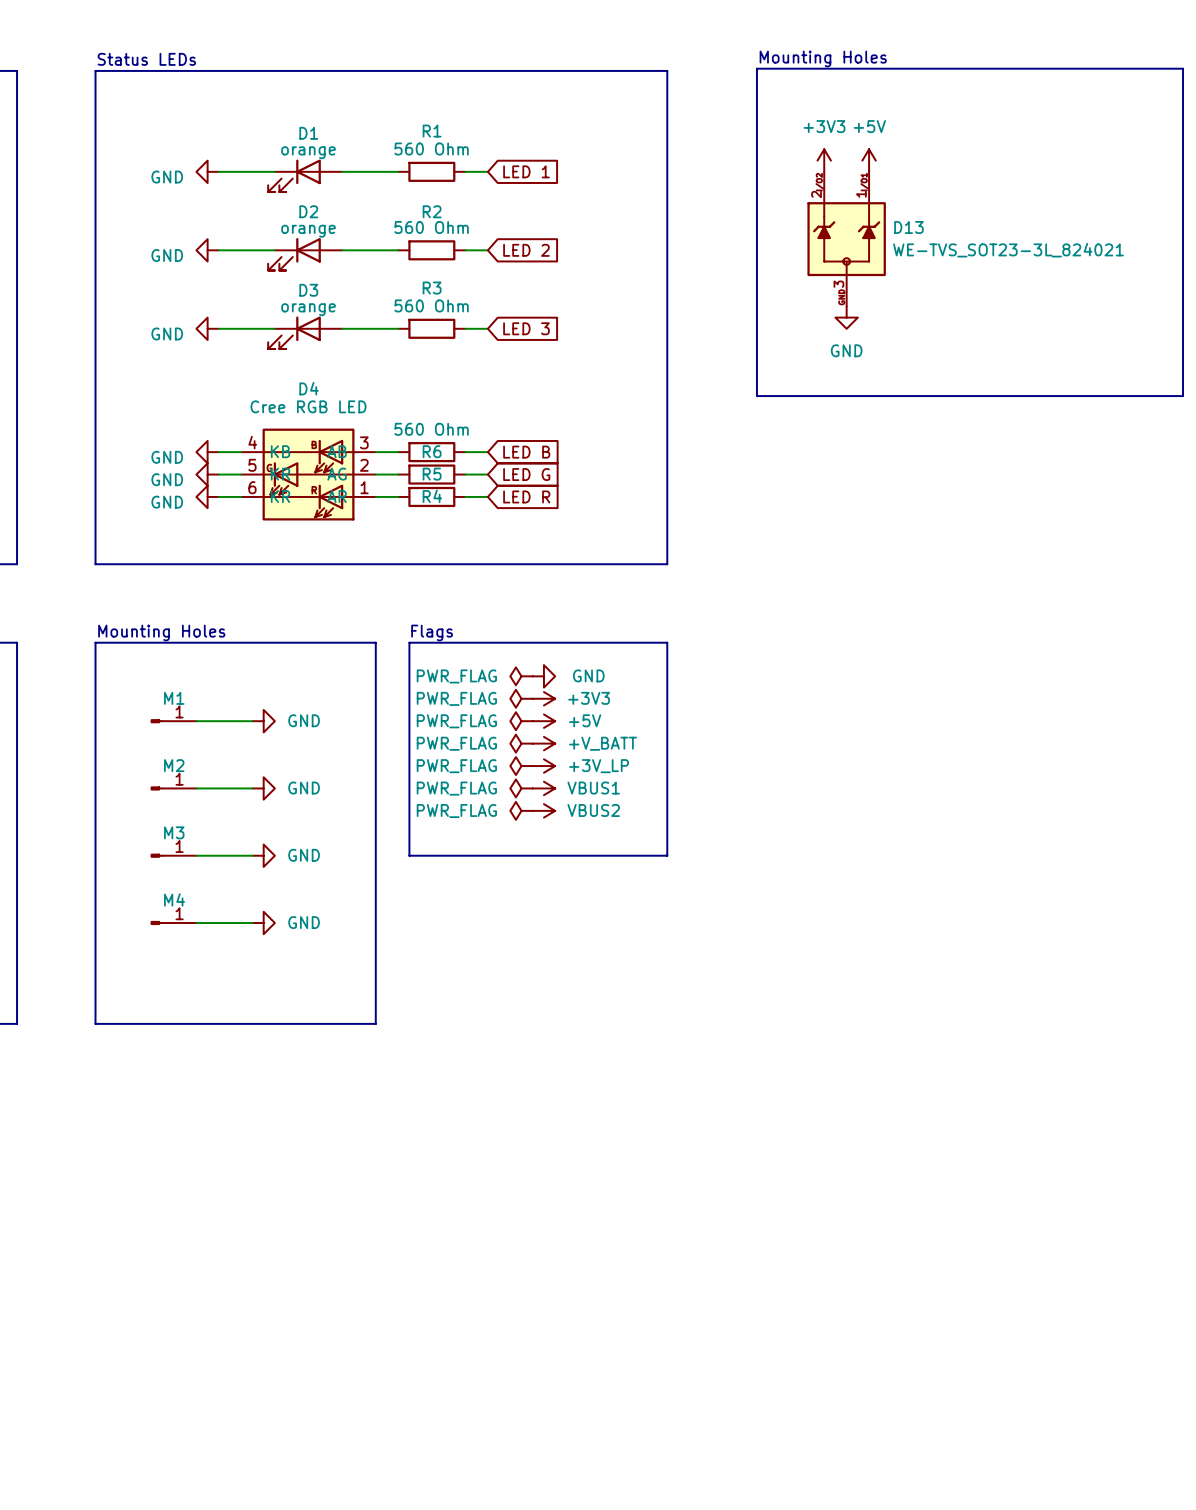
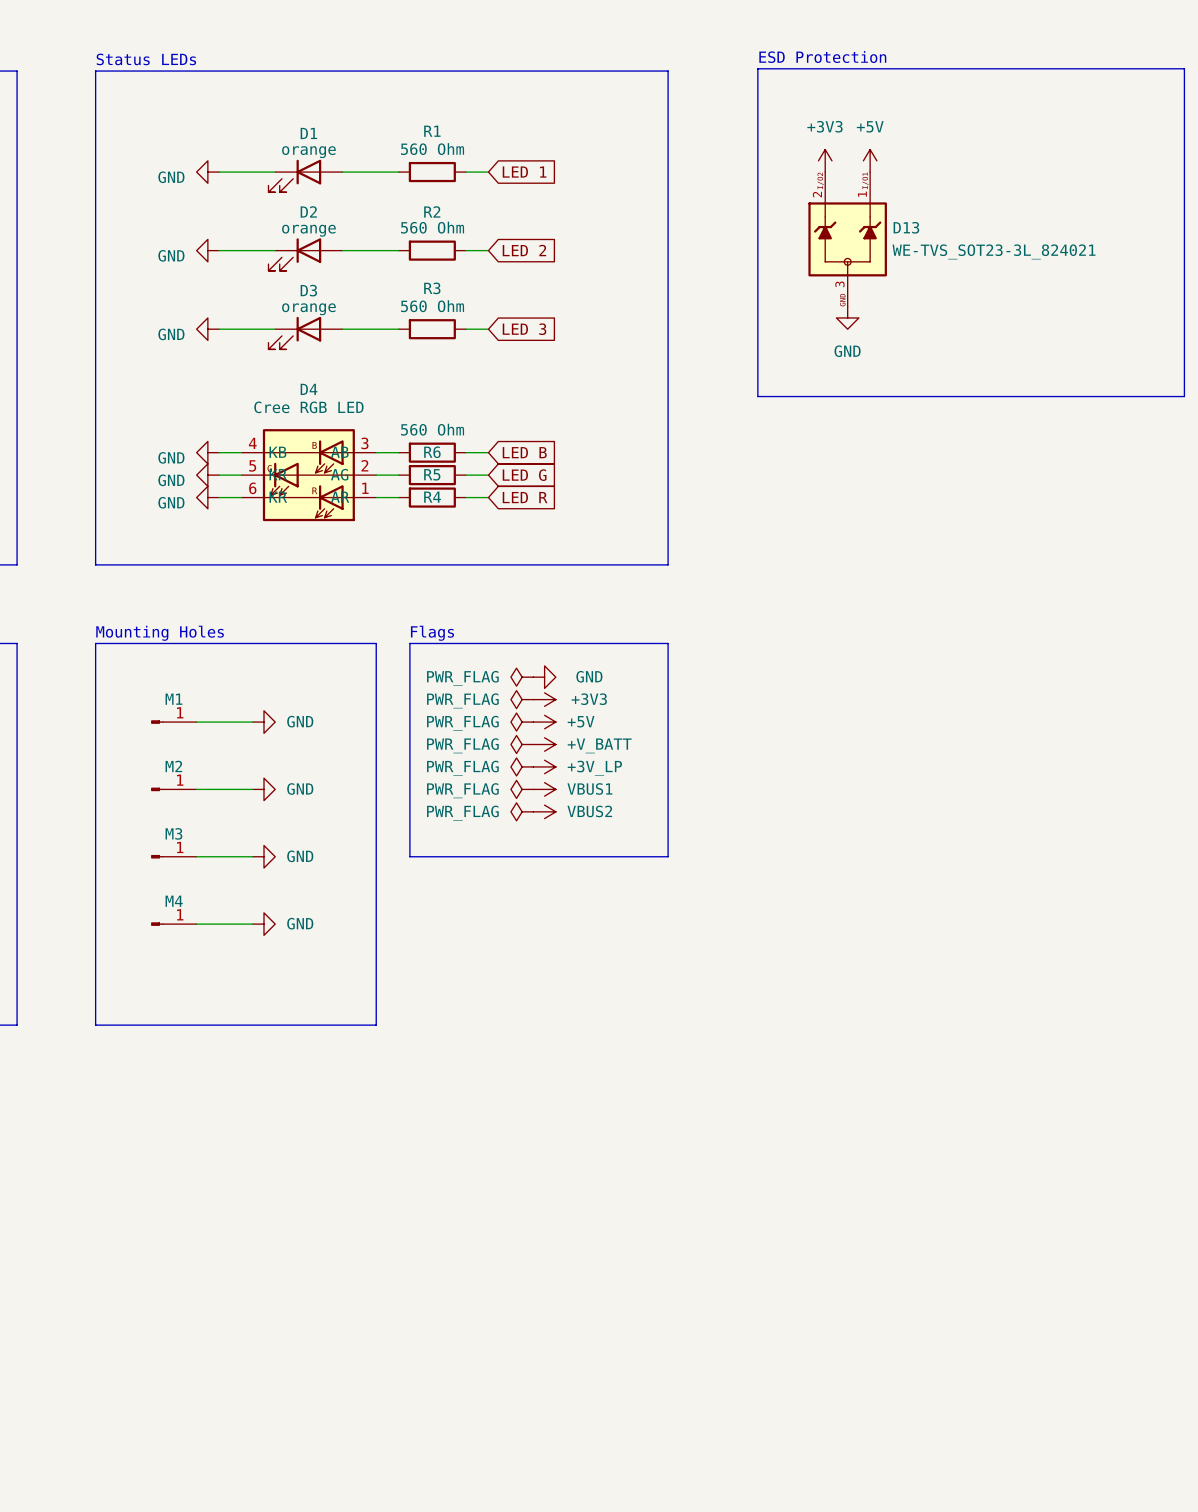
text: Mounting Holes (823, 58) -> ESD Protection (822, 57)

